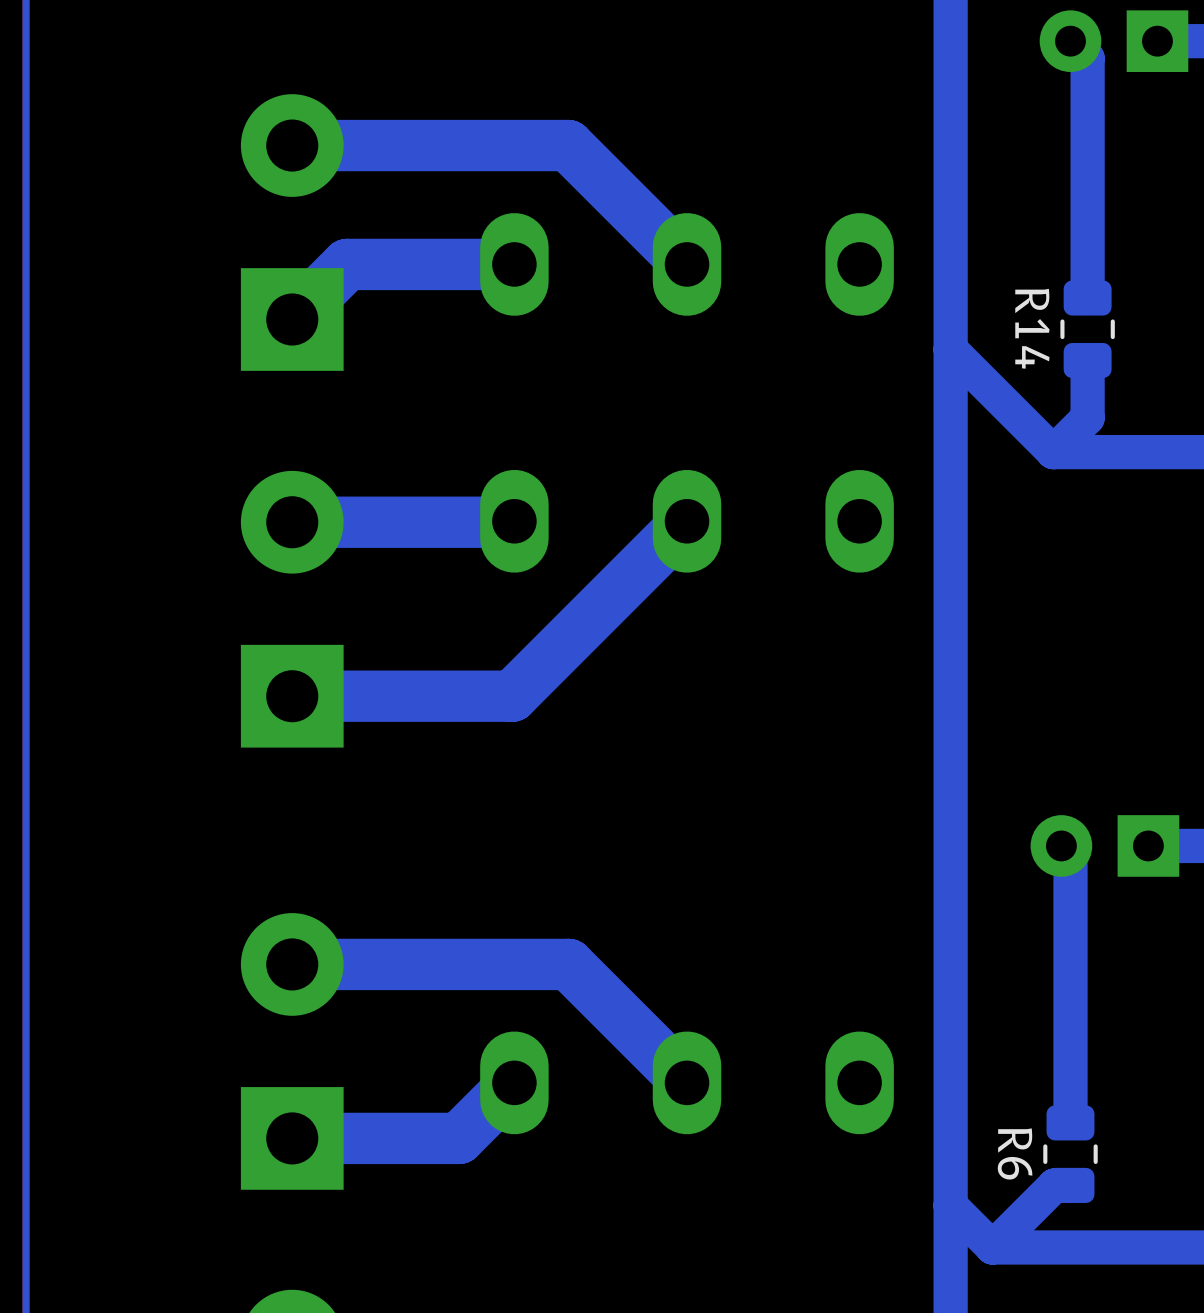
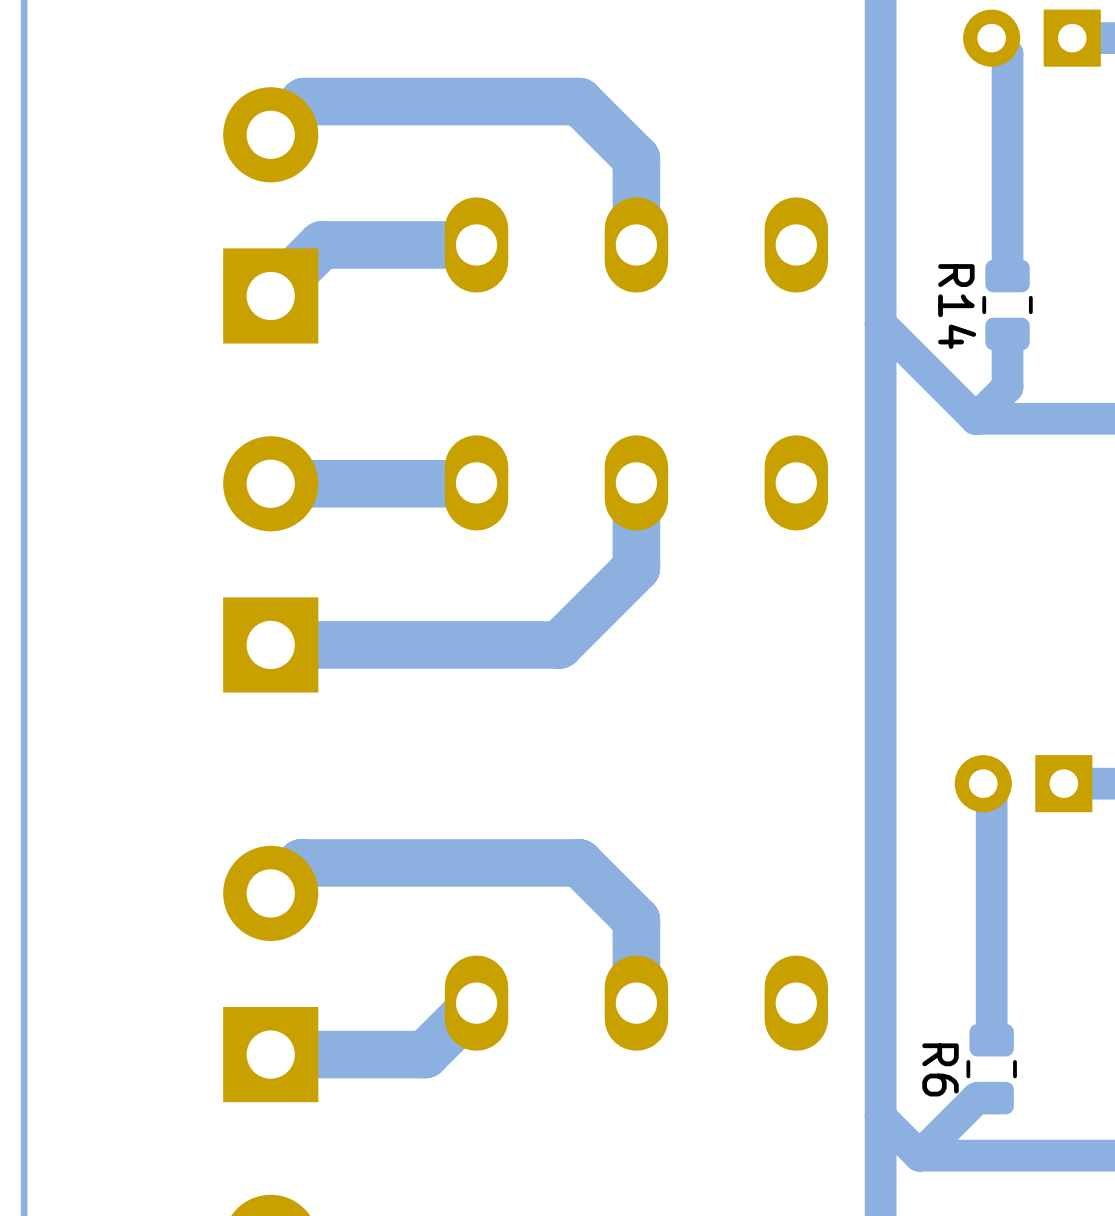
bottom track: (292, 145) (568, 145) (687, 264) -> (270, 134) (303, 101) (579, 101) (636, 158) (636, 244)
bottom track: (687, 521) (512, 696) -> (636, 482) (636, 567) (559, 644) (474, 644)
bottom track: (292, 964) (568, 964) (687, 1082) -> (270, 893) (301, 862) (579, 862) (636, 920) (636, 1003)

